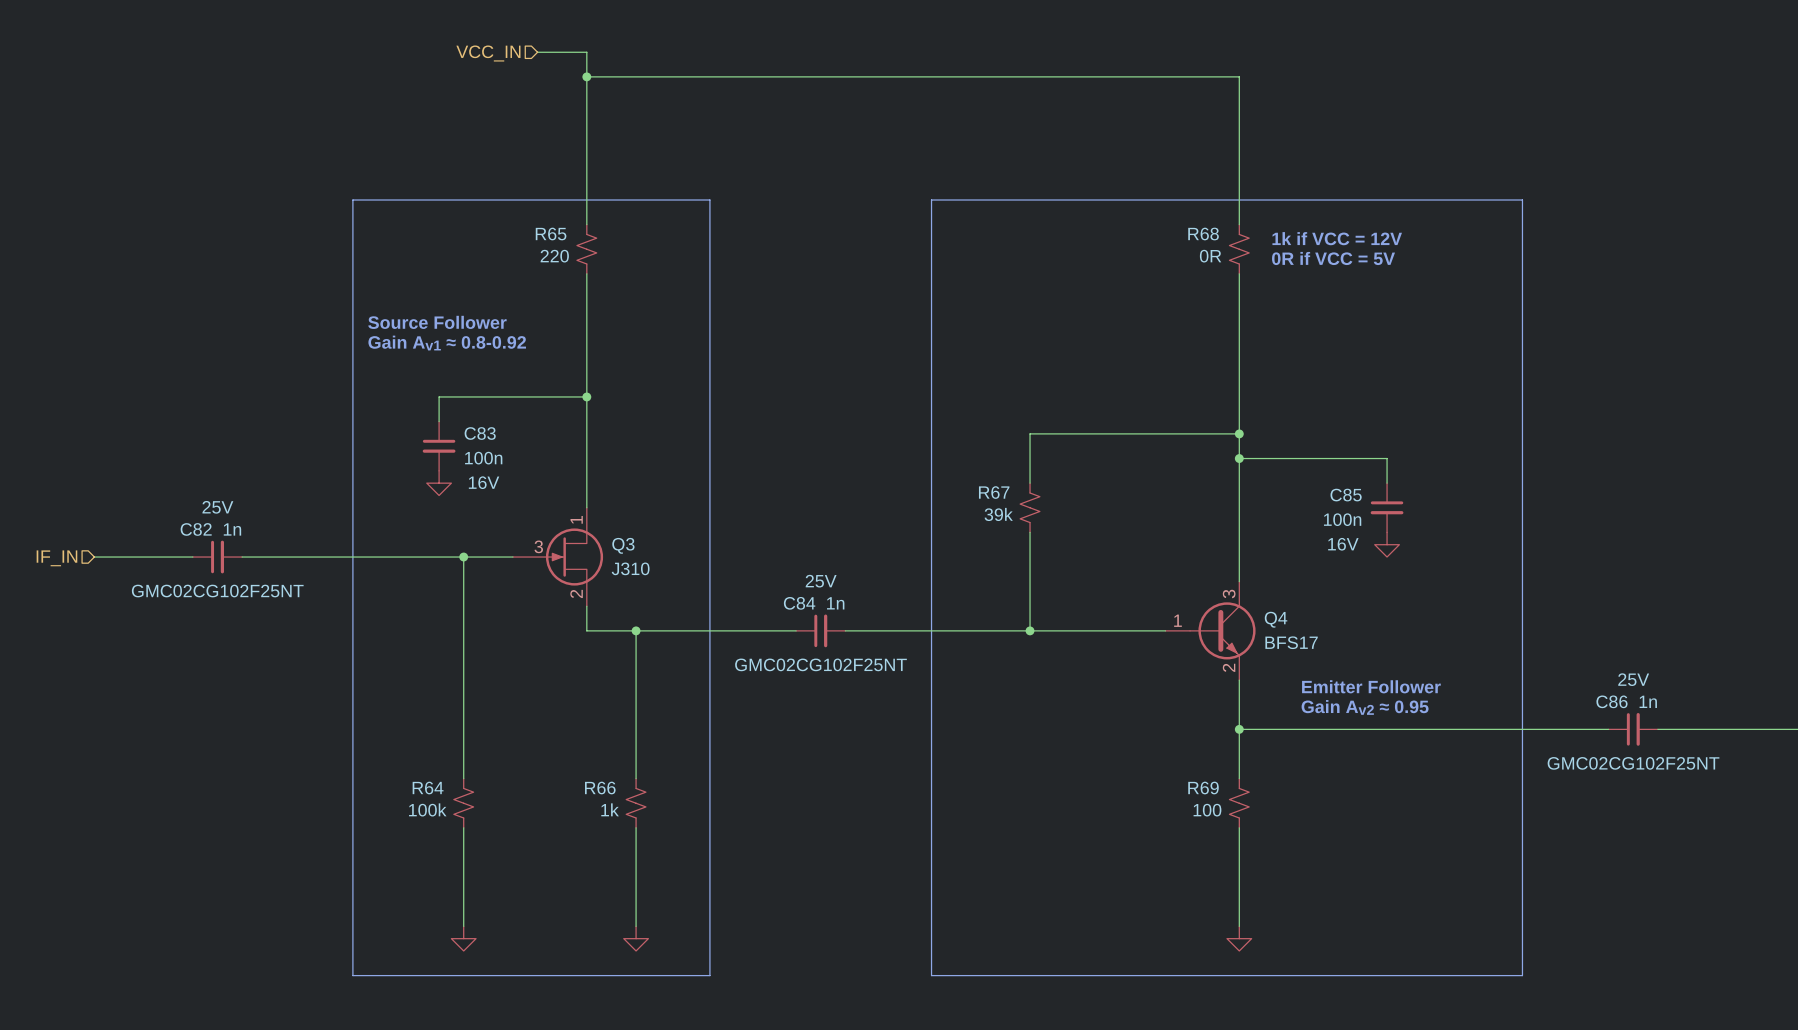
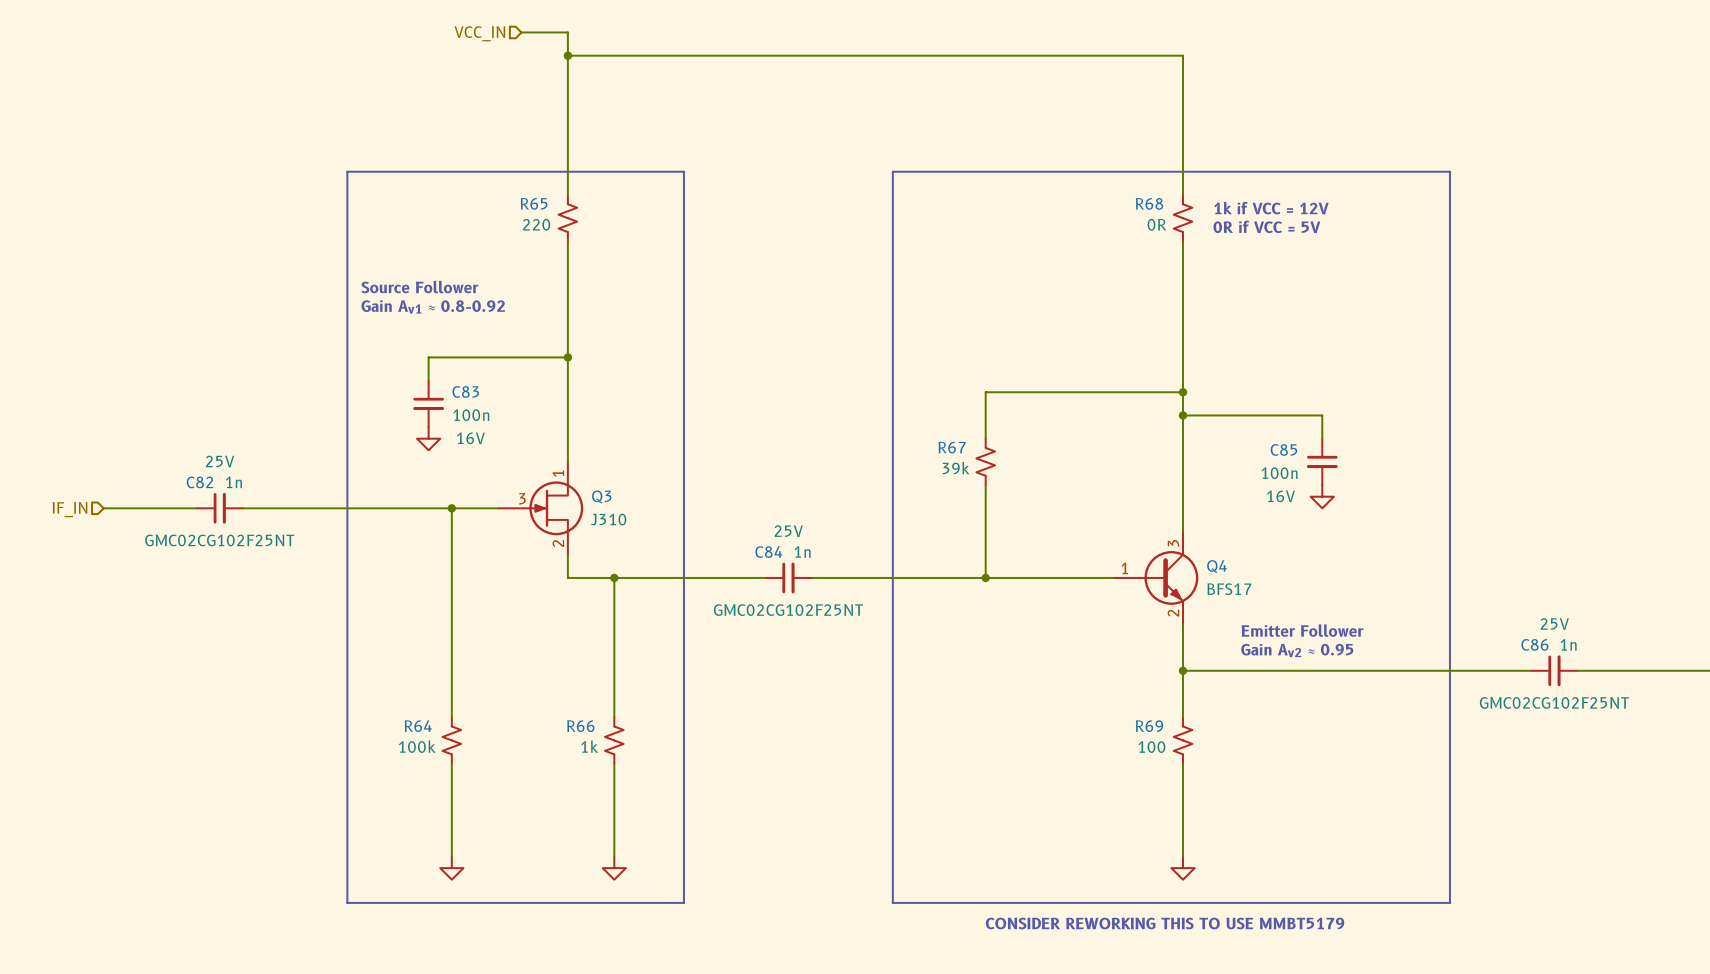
text: none -> CONSIDER REWORKING THIS TO USE MMBT5179 (1165, 923)

